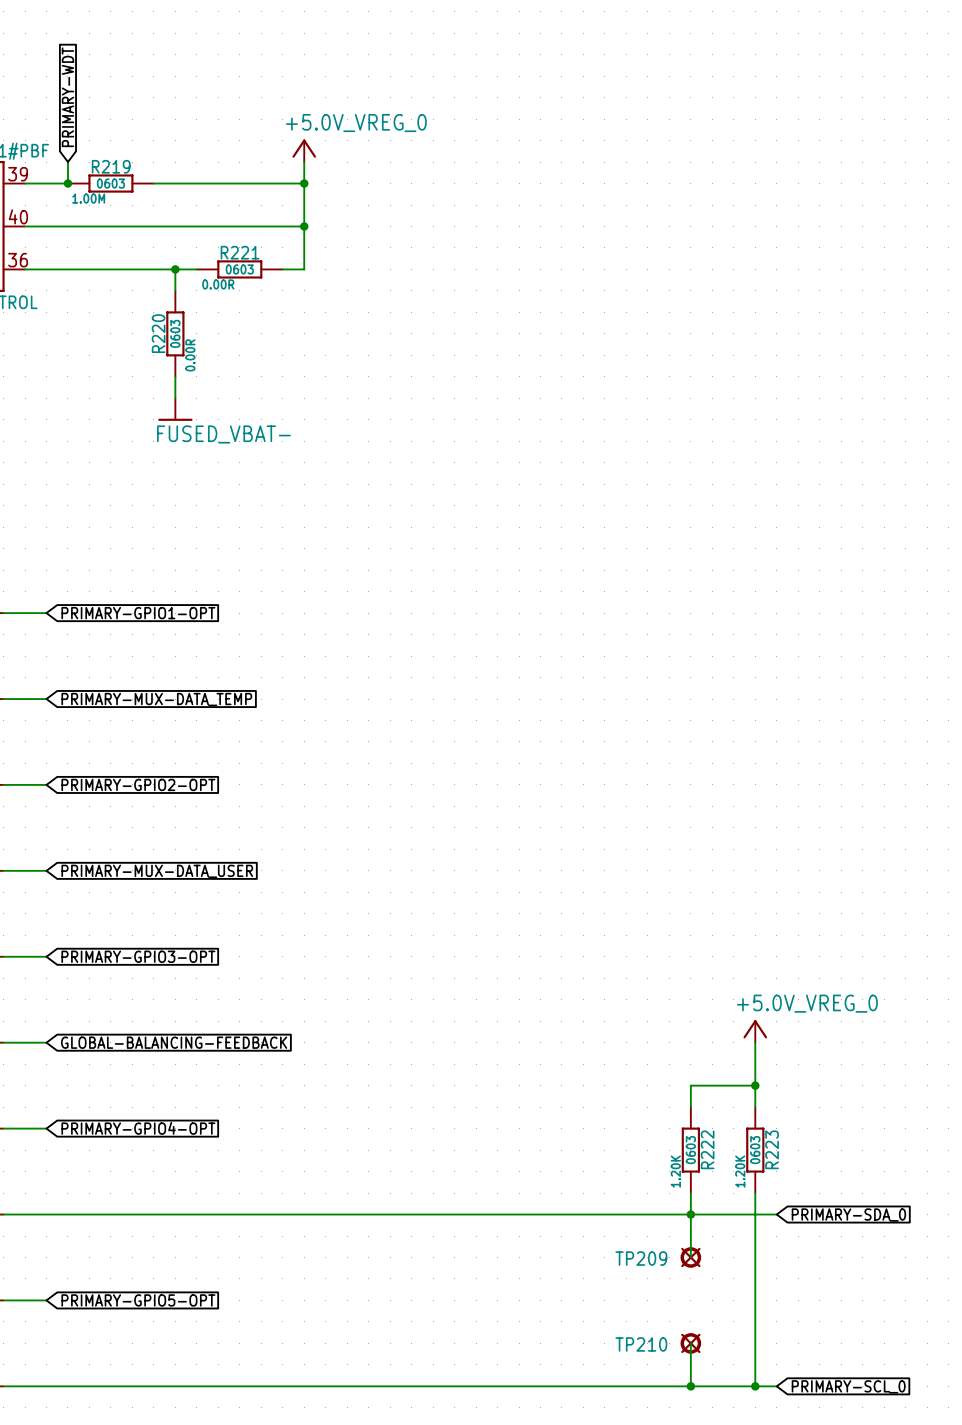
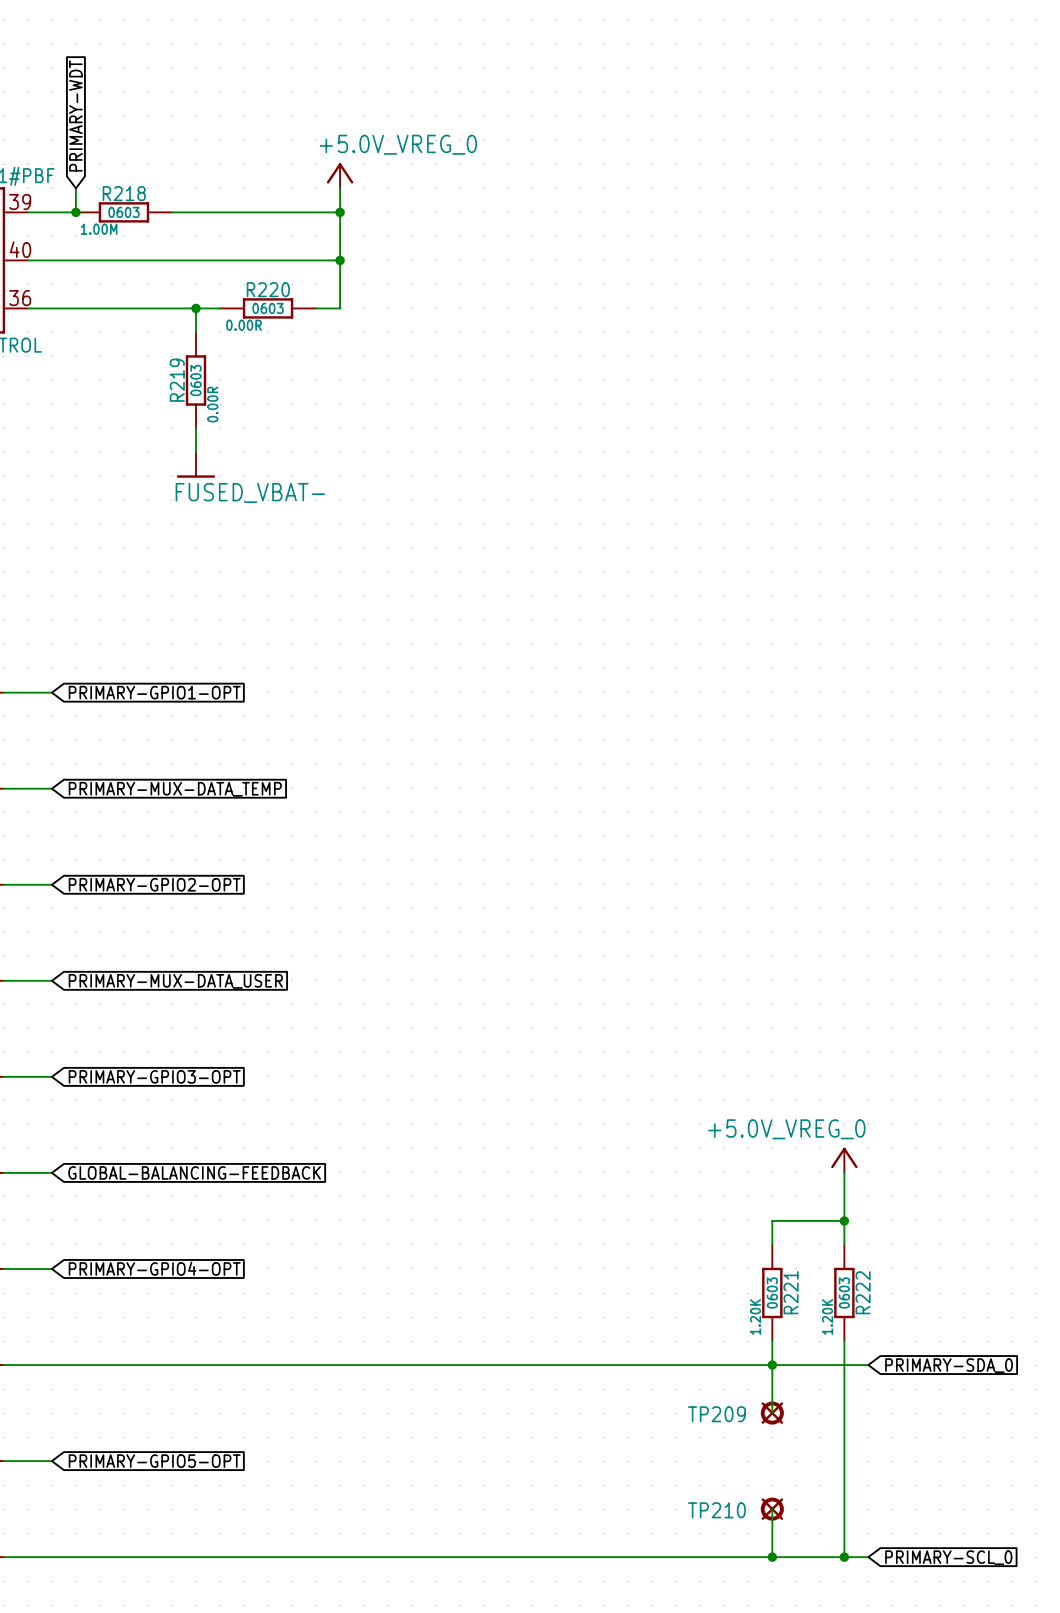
R219 name: R219 (111, 166) -> R218 (124, 193)
R221 name: R221 (240, 252) -> R220 (268, 289)
R220 name: R220 (158, 333) -> R219 (177, 380)
power symbol text position: +5.0V_VREG_0 (807, 1003) -> +5.0V_VREG_0 (786, 1129)
R222 name: R222 (707, 1149) -> R221 (791, 1292)
R223 name: R223 (772, 1149) -> R222 (863, 1292)

